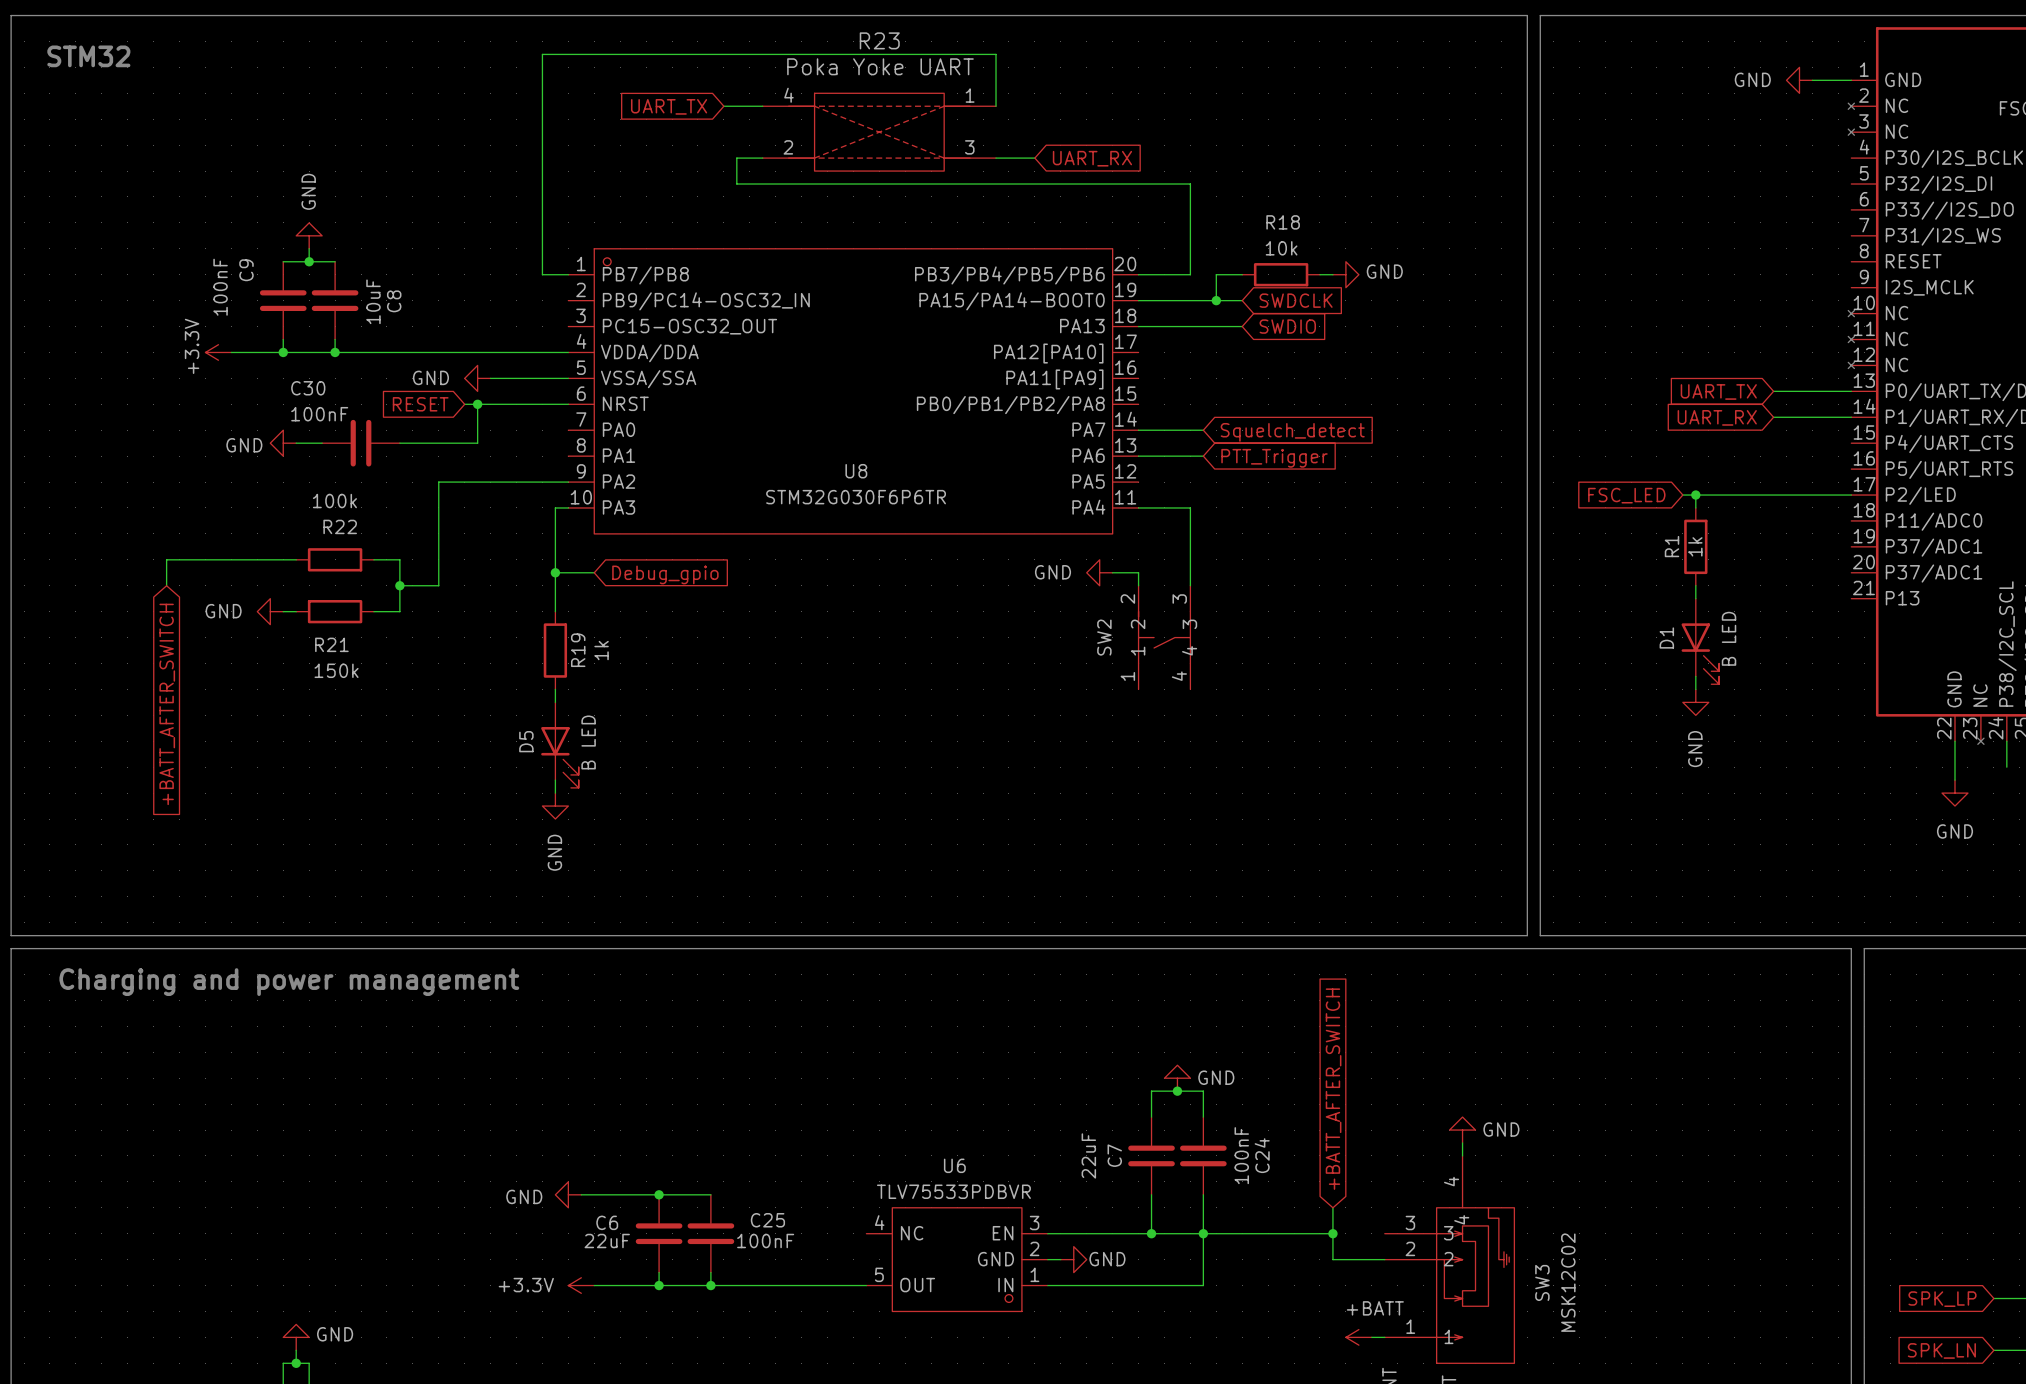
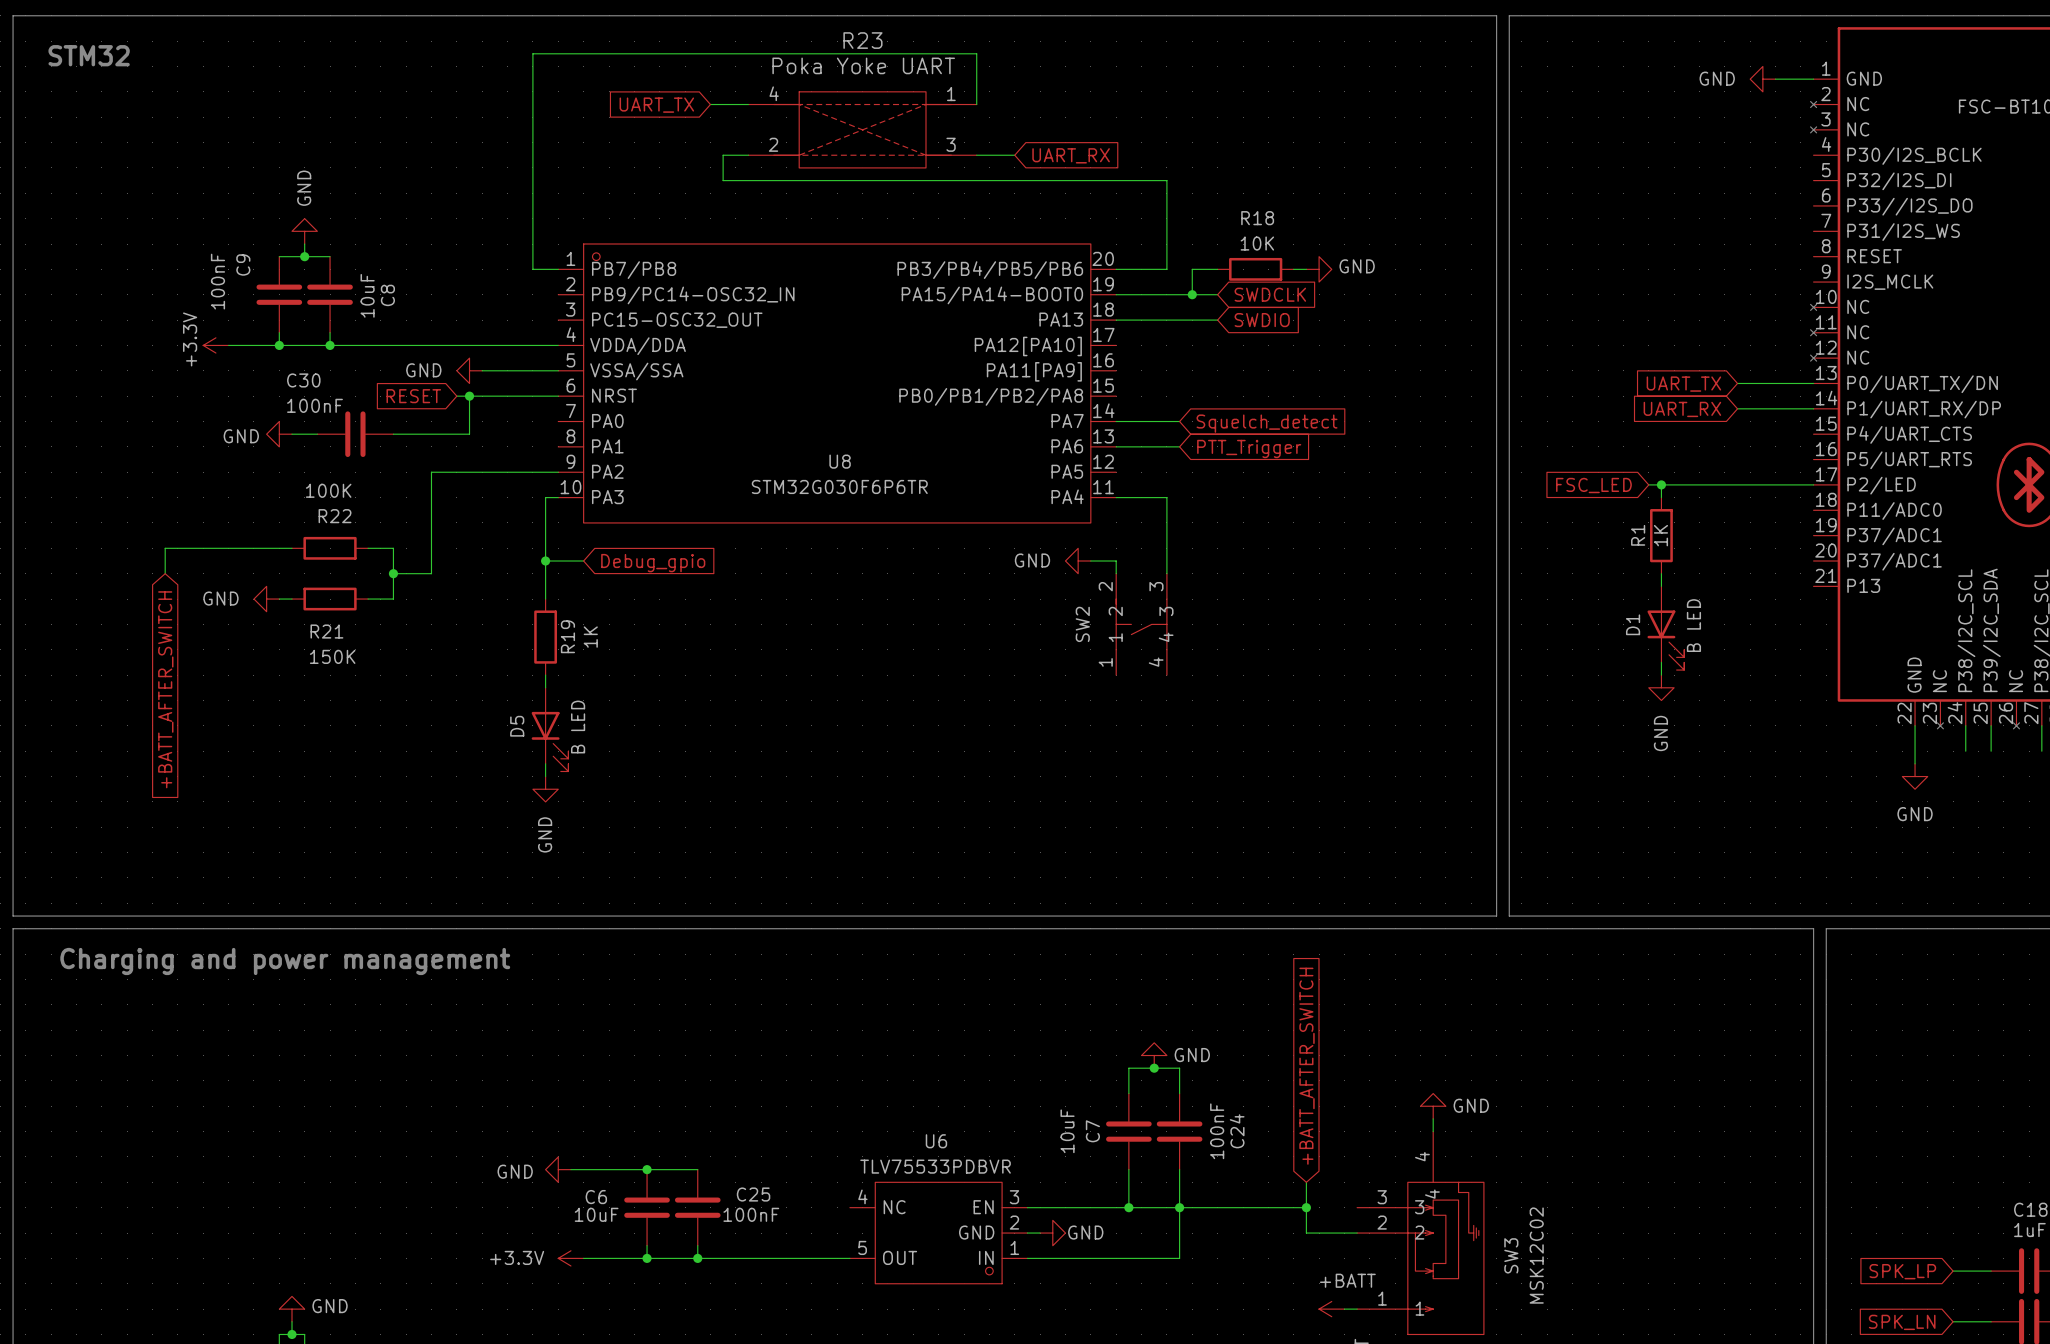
R18 value: 10k (1281, 248) -> 10K (1257, 243)
R22 value: 100k (334, 501) -> 100K (328, 490)
R1 value: 1k (1695, 546) -> 1K (1660, 535)
R19 value: 1k (601, 650) -> 1K (590, 637)
R21 value: 150k (336, 670) -> 150K (332, 656)
C7 value: 22uF (1088, 1155) -> 10uF (1067, 1131)
C6 value: 22uF (607, 1241) -> 10uF (596, 1214)

